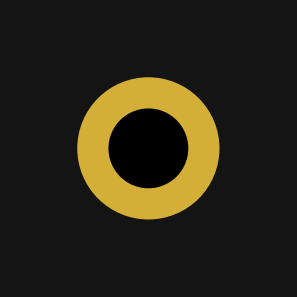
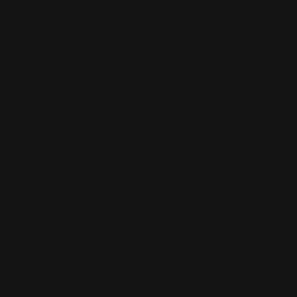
part: (148, 148) -> none

